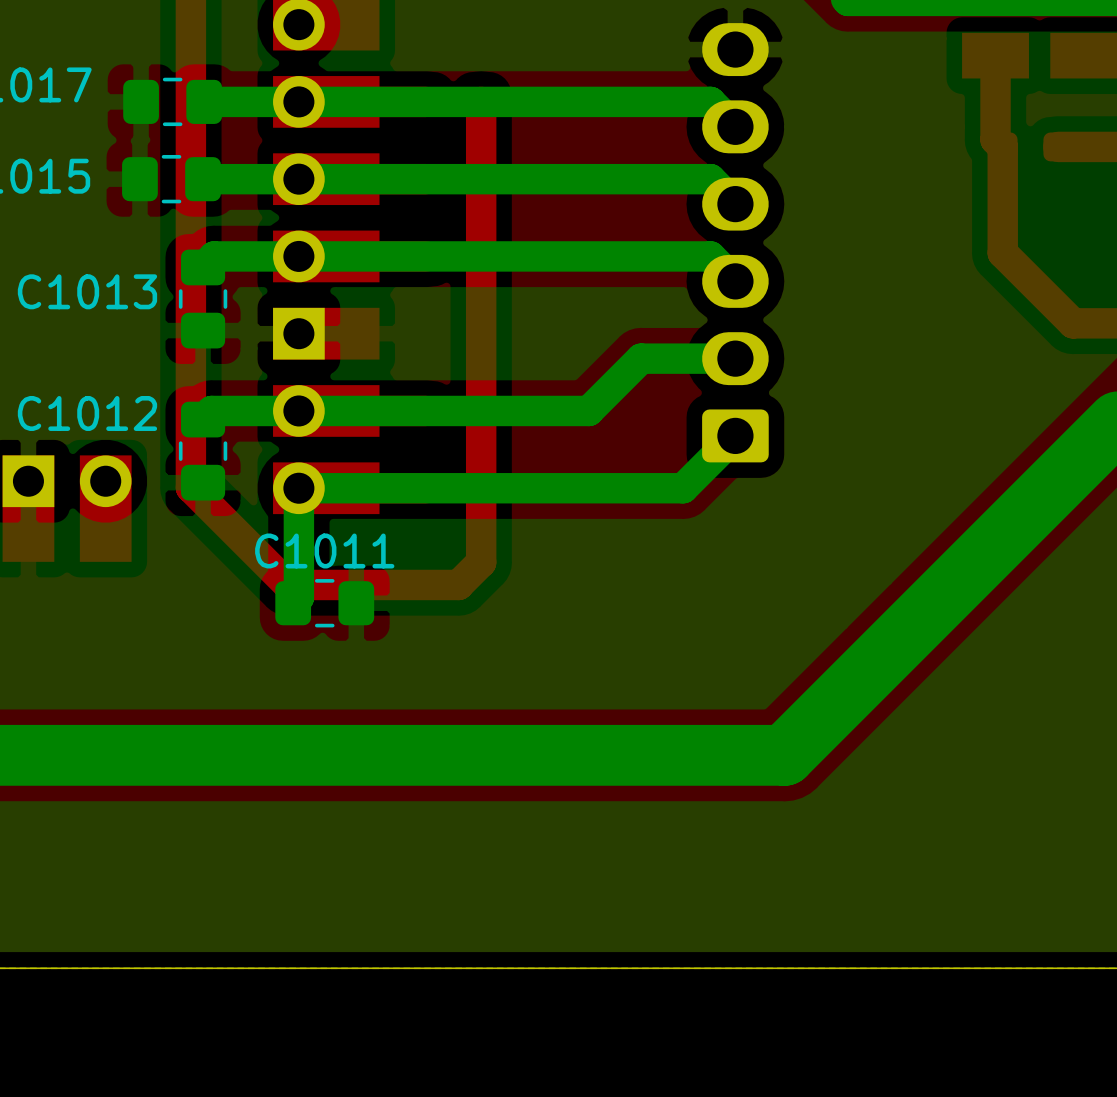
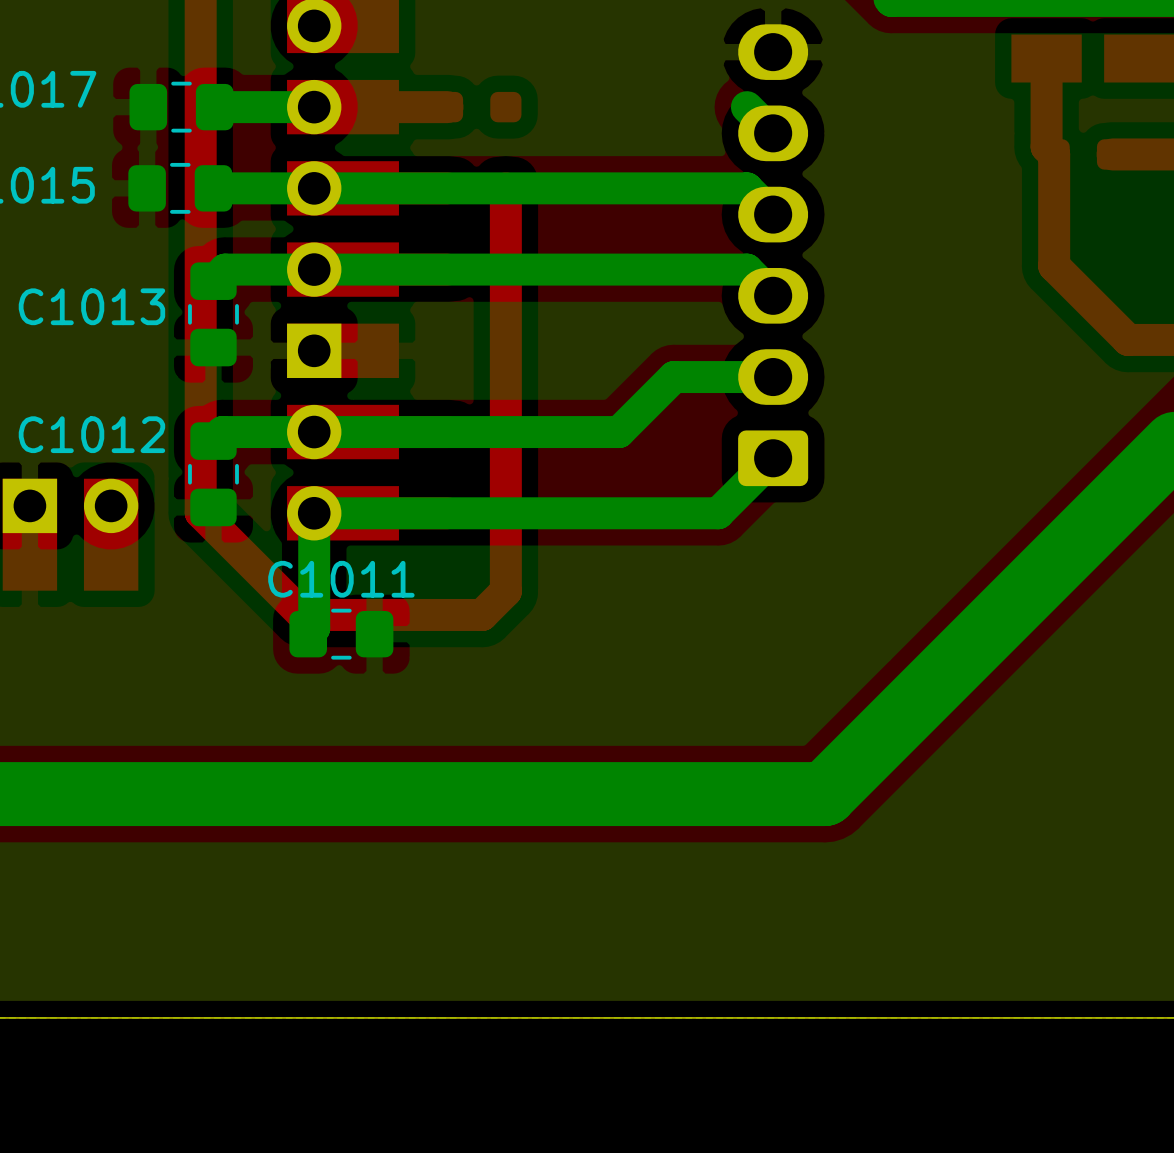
top track: (481, 101) (481, 179) -> none
bottom track: (710, 101) (298, 101) -> none

